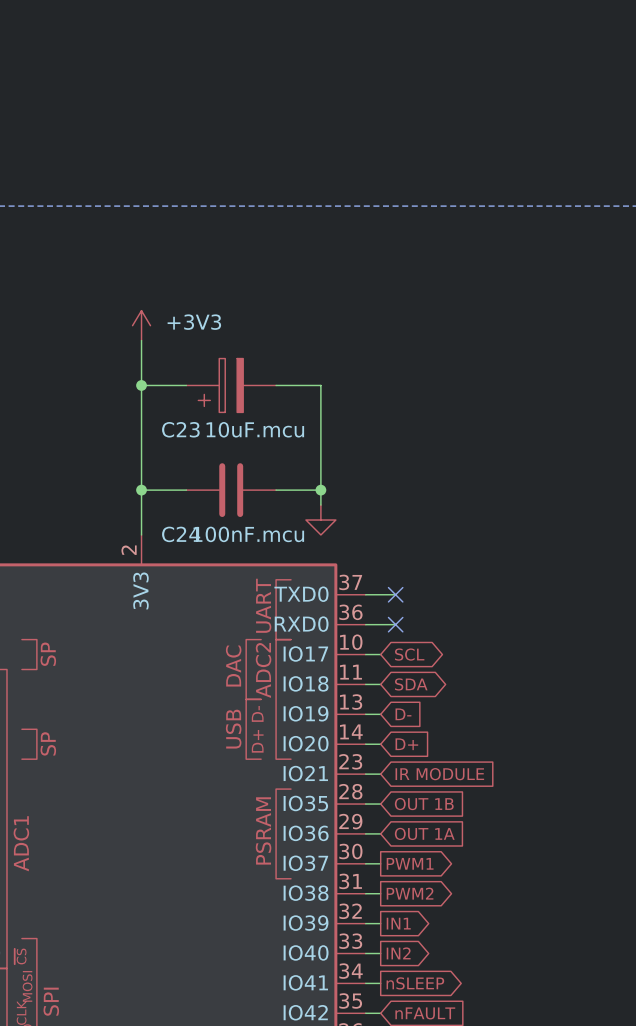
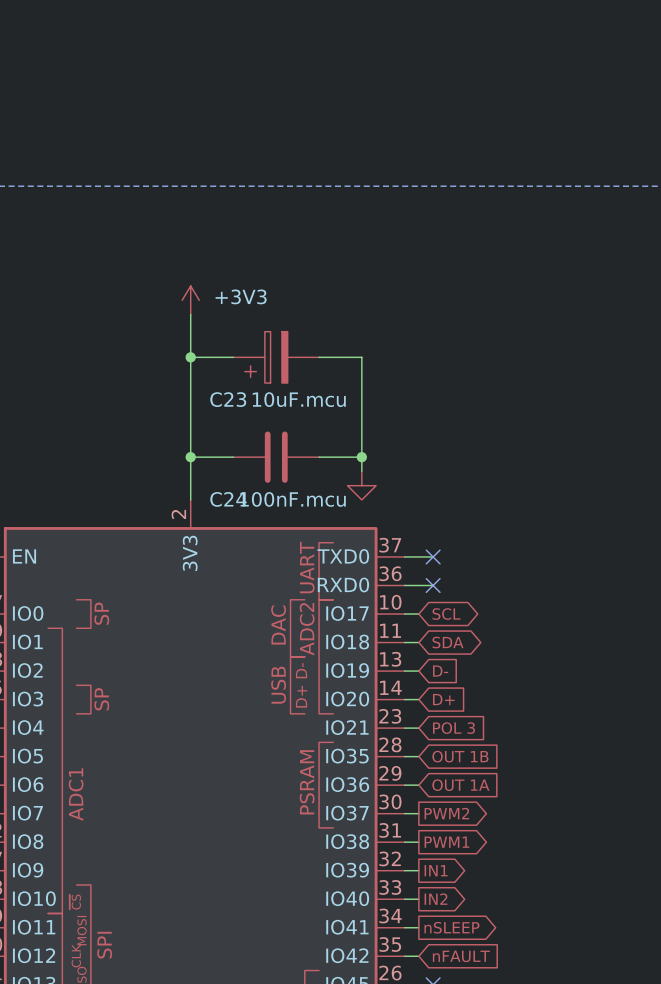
global label: IR MODULE (439, 774) -> POL 3 (453, 728)
global label: PWM1 (410, 863) -> PWM2 (446, 813)
global label: PWM2 (410, 893) -> PWM1 (446, 842)

